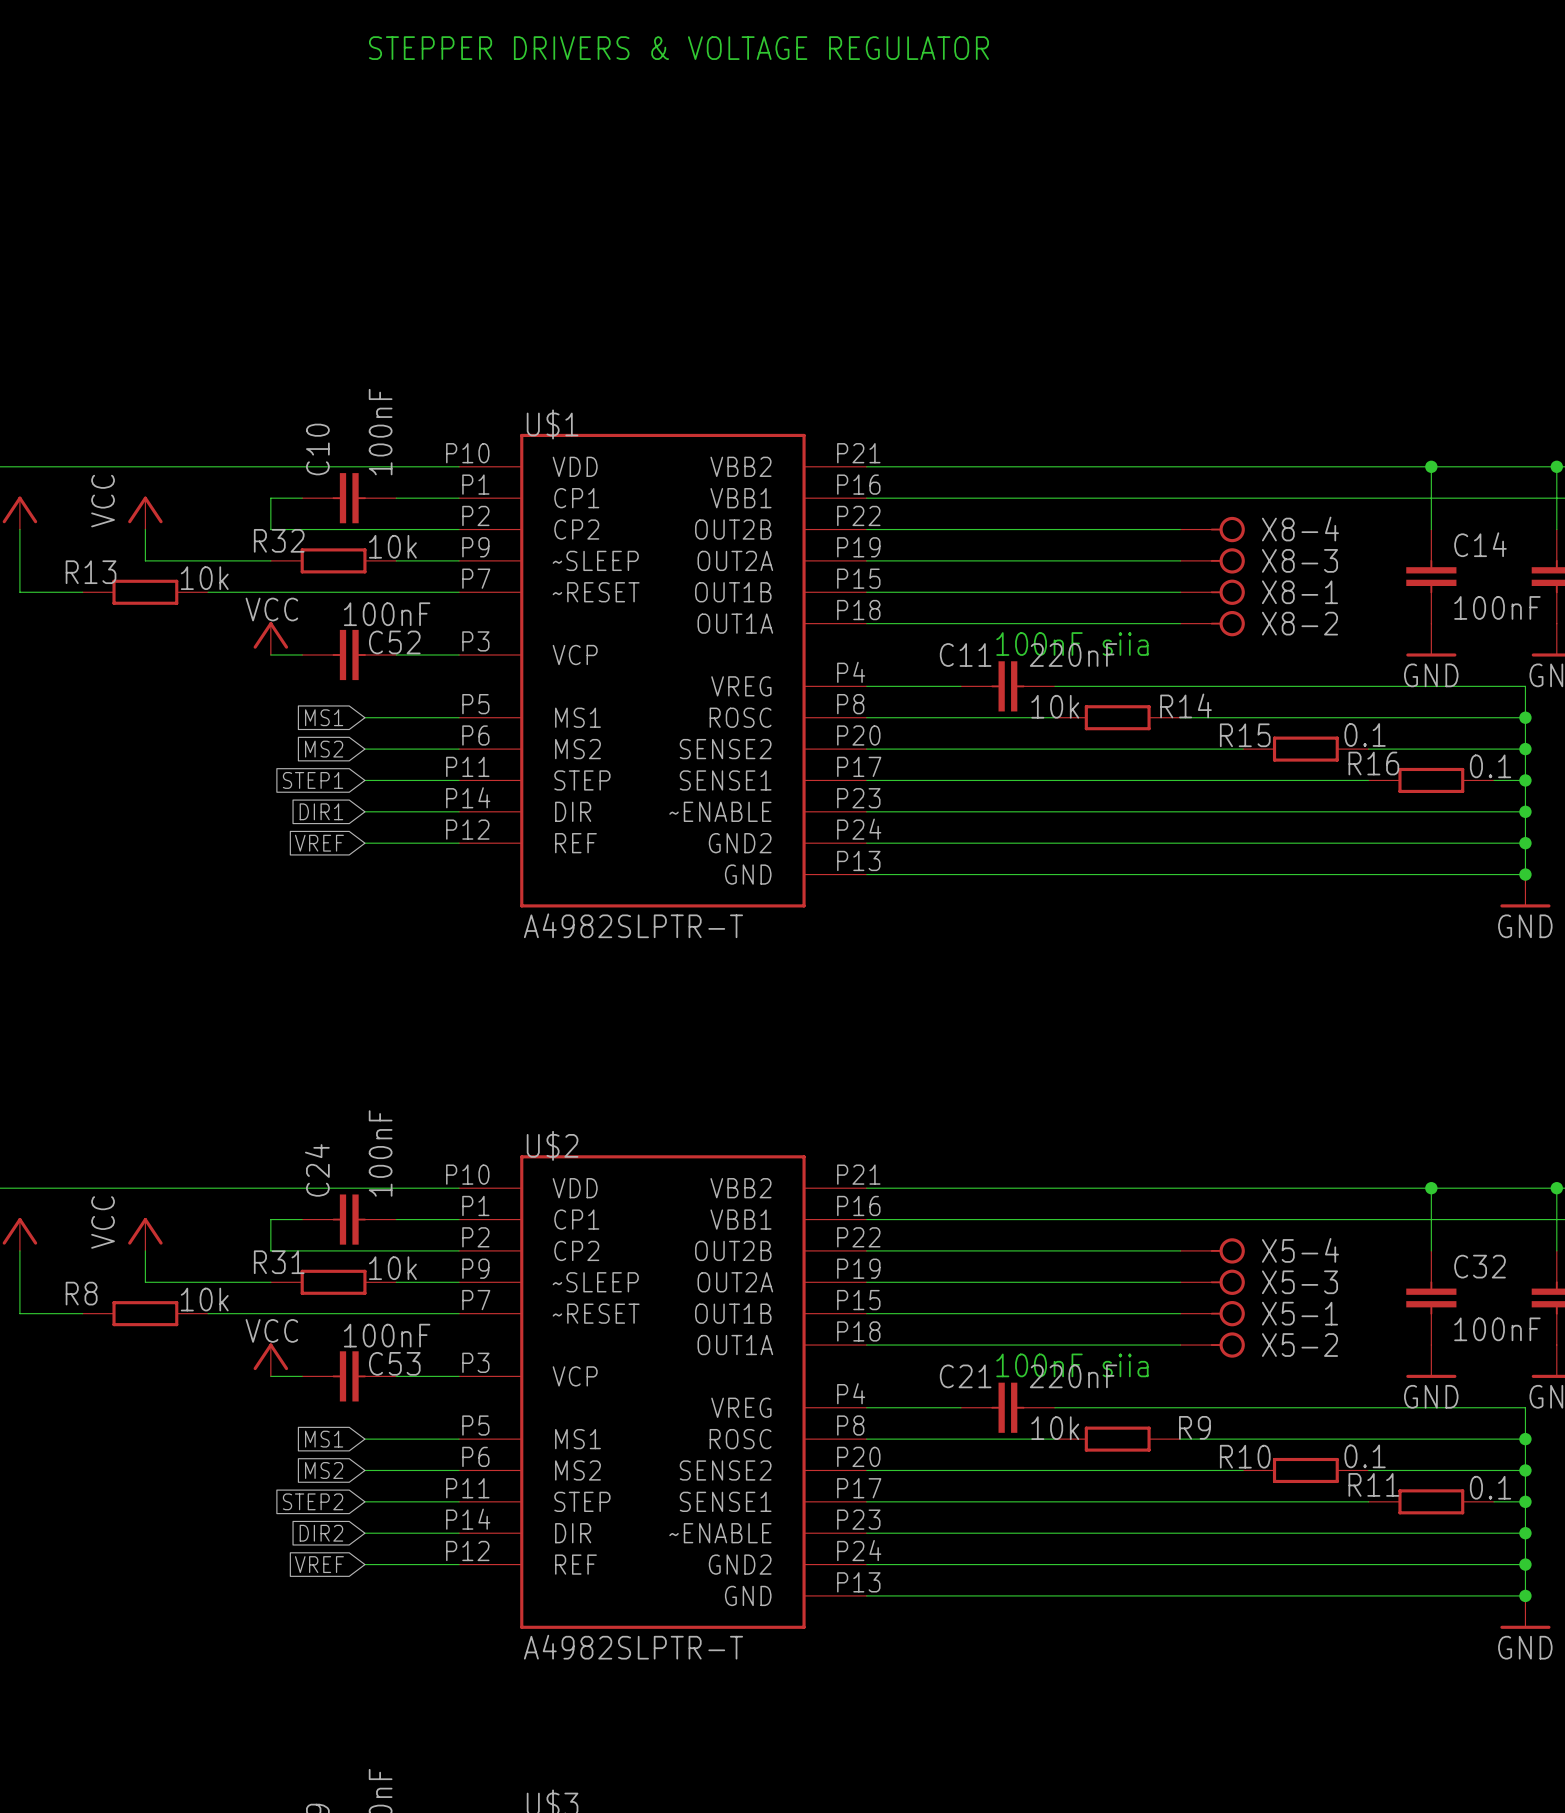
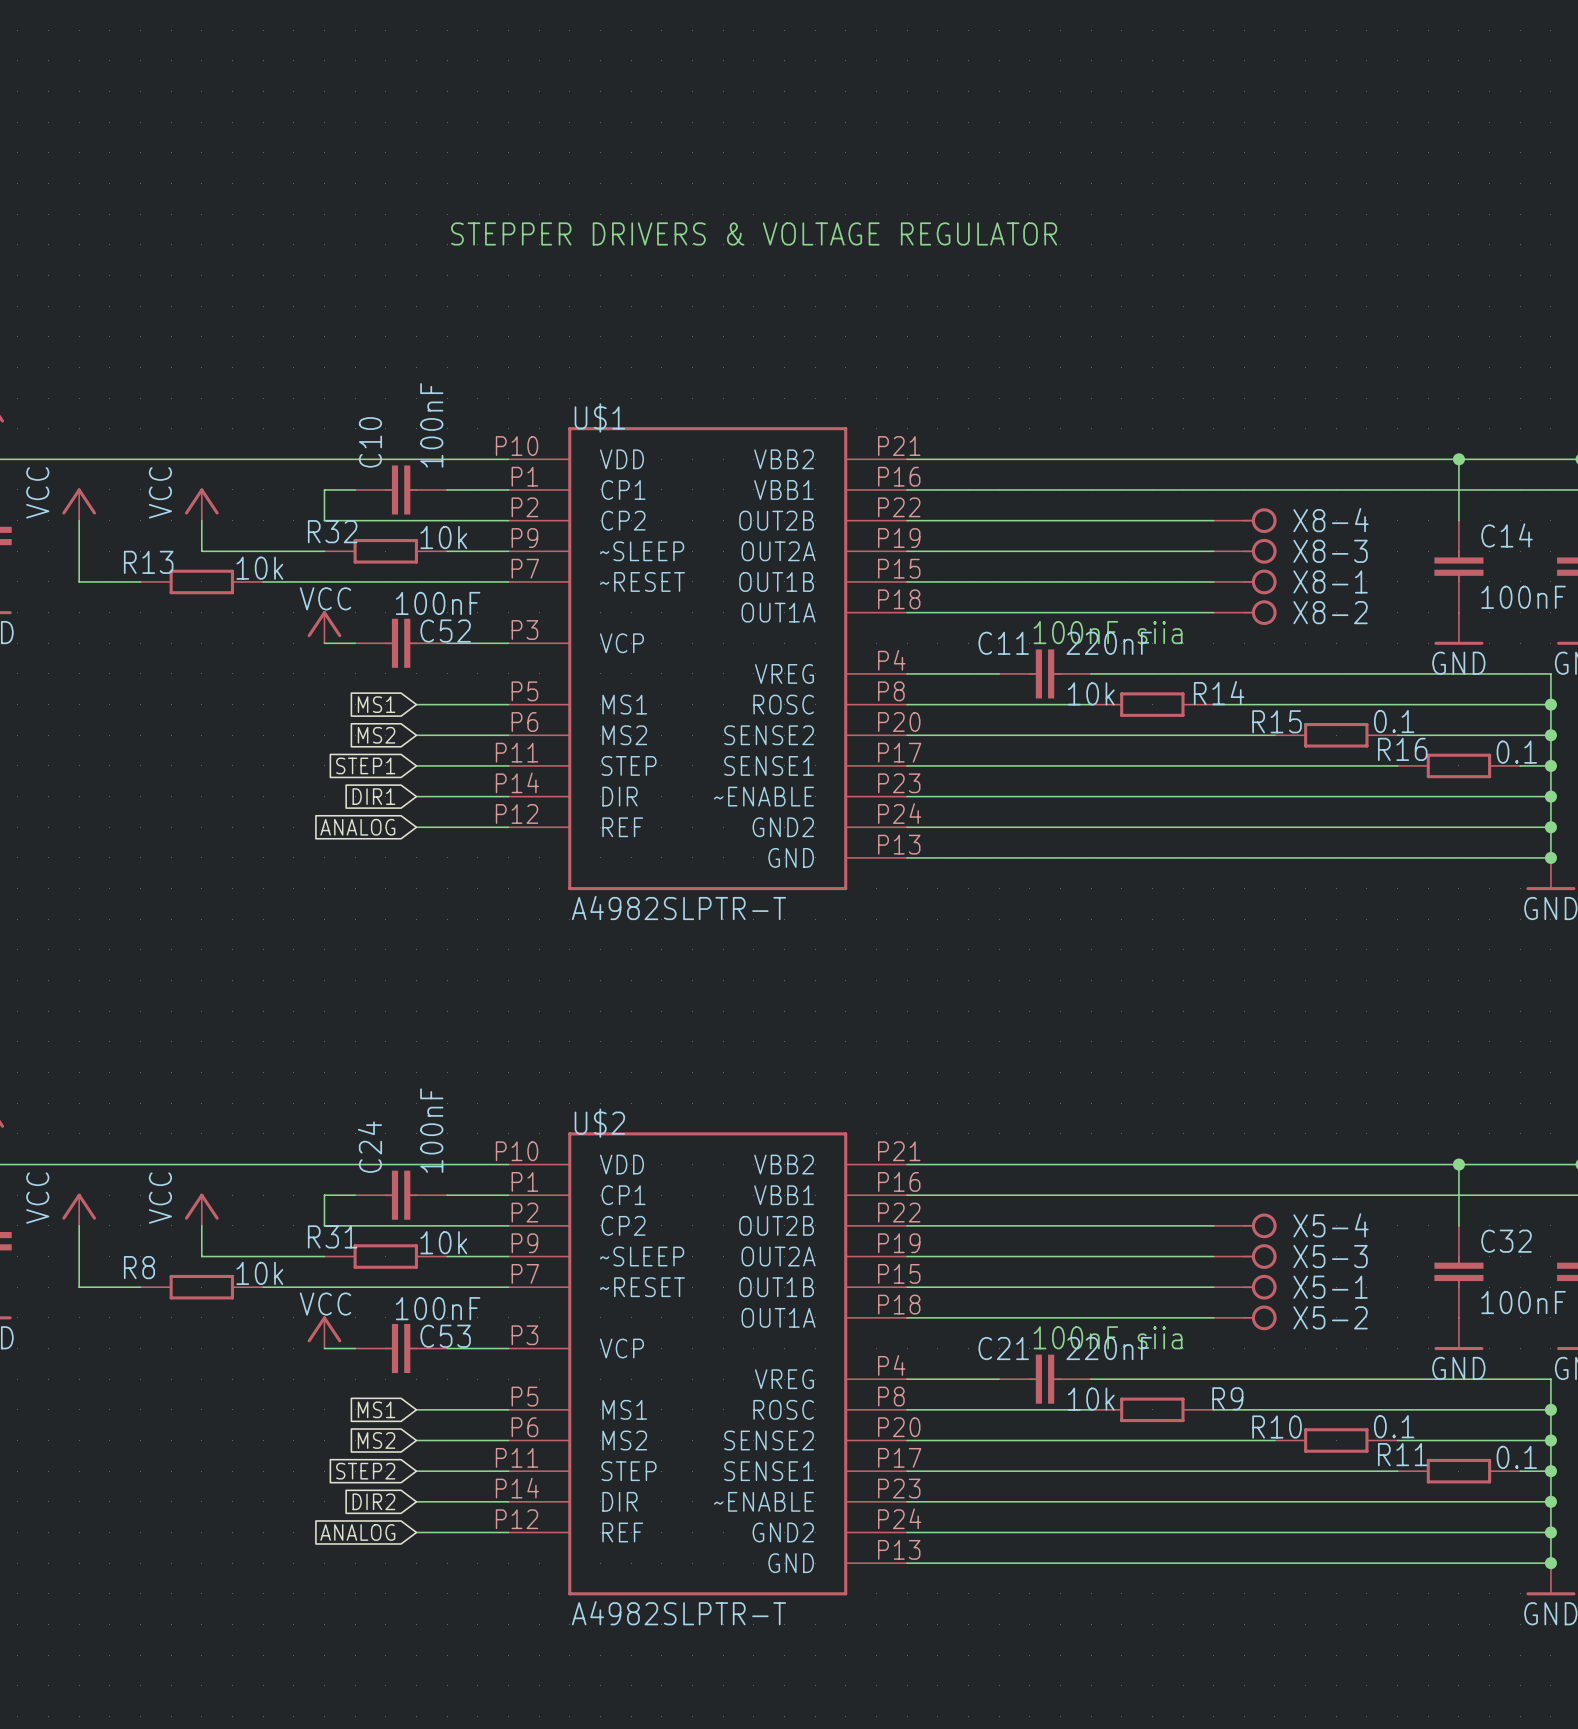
text position: STEPPER DRIVERS & VOLTAGE REGULATOR (678, 48) -> STEPPER DRIVERS & VOLTAGE REGULATOR (754, 233)
global label: VREF (319, 843) -> ANALOG (357, 827)
global label: VREF (319, 1564) -> ANALOG (357, 1532)

